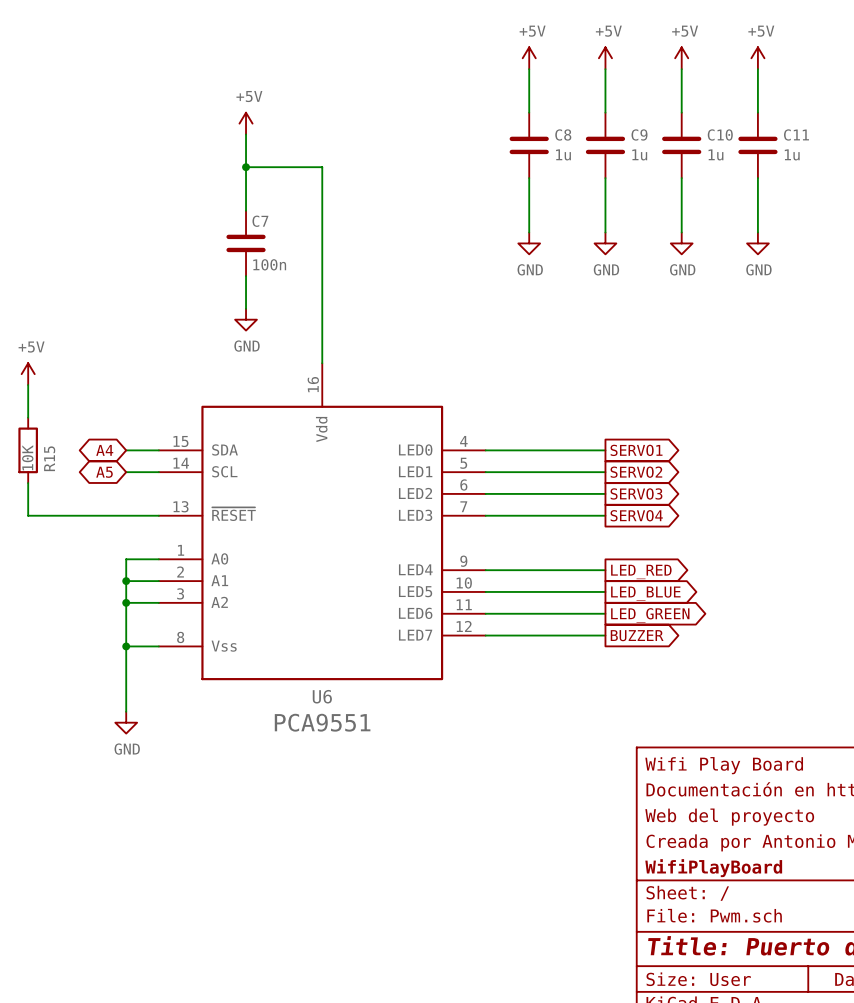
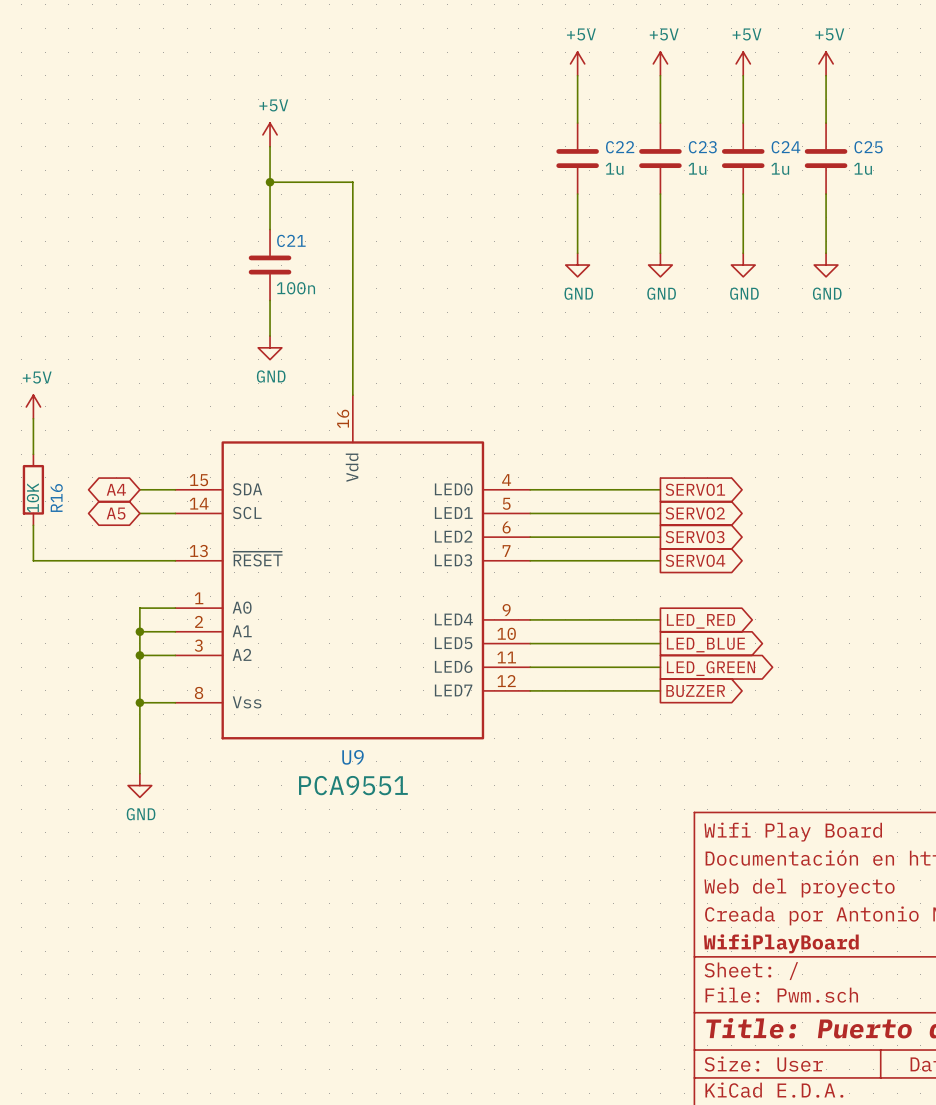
C8 name: C8 (563, 134) -> C22 (620, 147)
C9 name: C9 (639, 134) -> C23 (702, 147)
C10 name: C10 (720, 134) -> C24 (785, 147)
C11 name: C11 (796, 134) -> C25 (868, 147)
C7 name: C7 (260, 221) -> C21 (291, 240)
R15 name: R15 (49, 458) -> R16 (56, 497)
U6 name: U6 (322, 696) -> U9 (353, 757)

